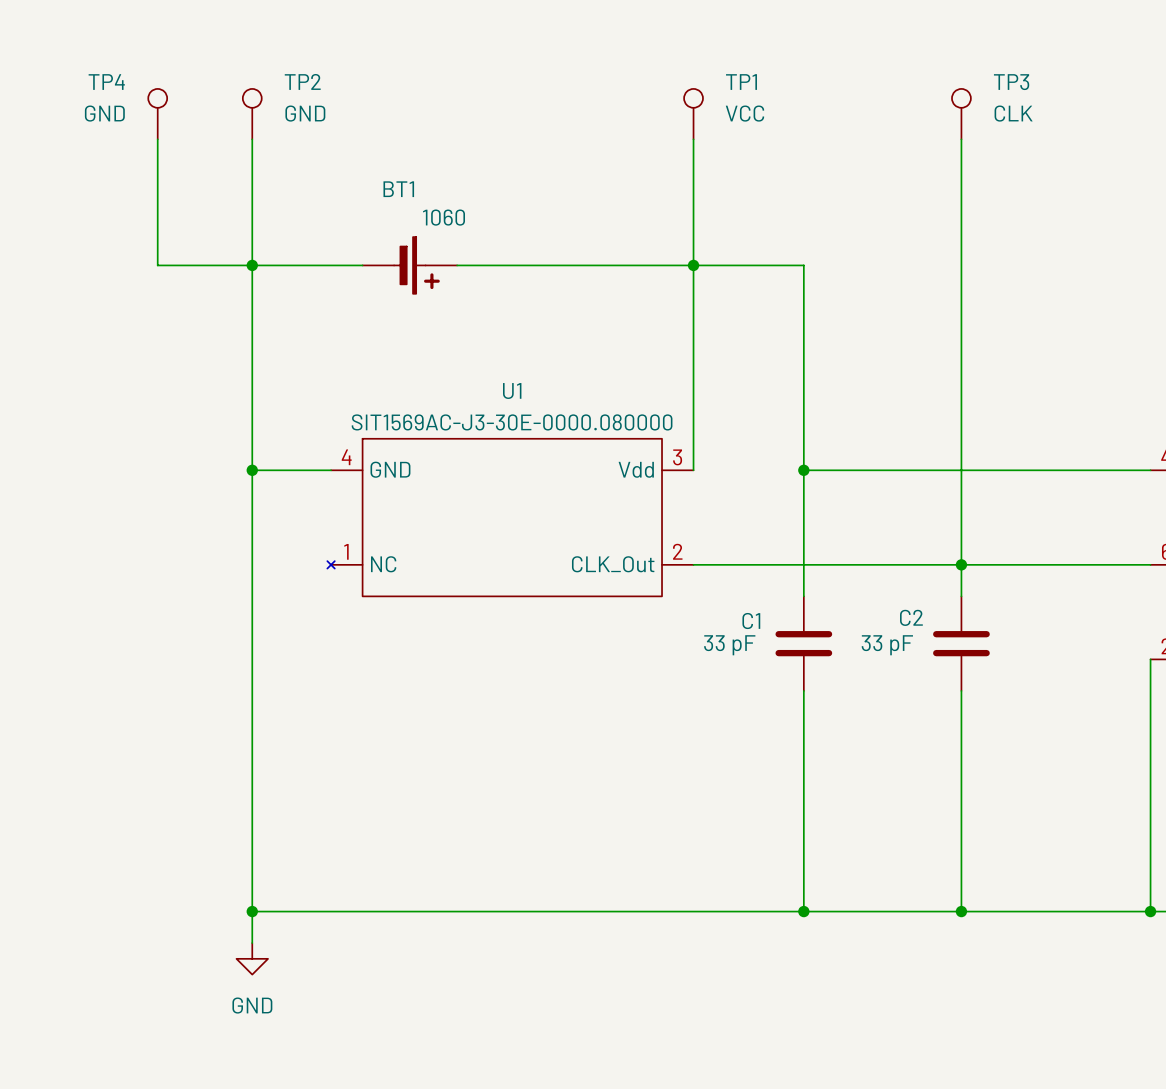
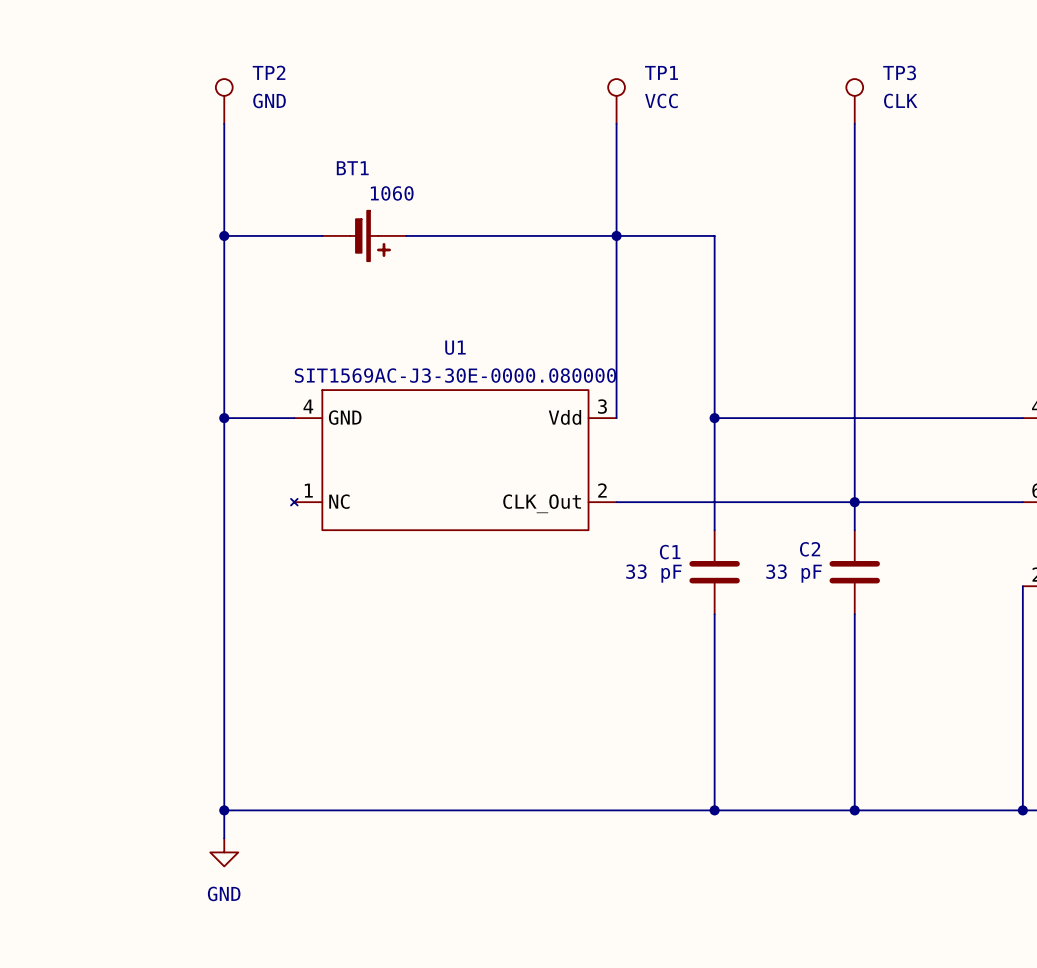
TP4: GND (157, 114) -> none
wire: (157, 139) (157, 265) (252, 265) -> none

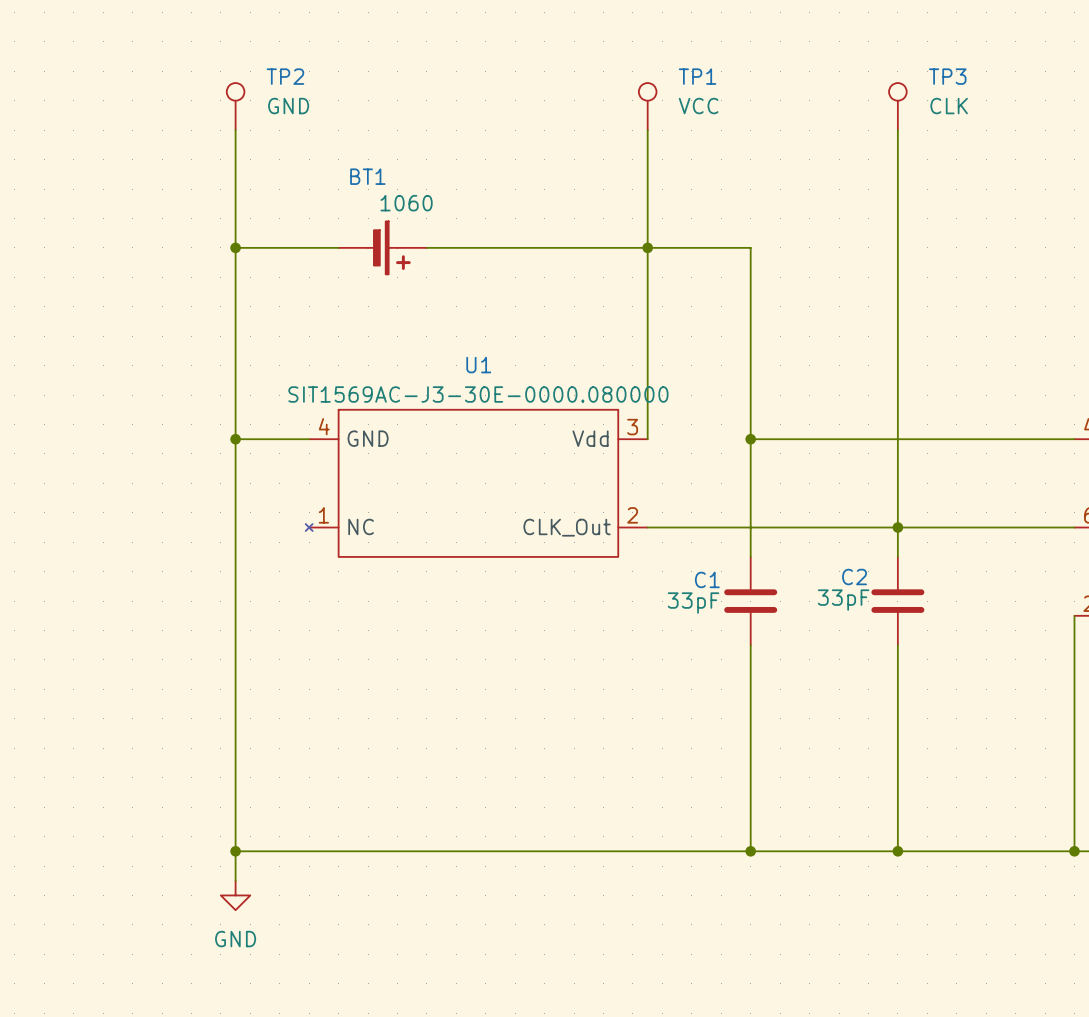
C2 value: none -> 33pF (843, 600)
C1 text: 33 pF (653, 573) -> none
C1 value: none -> 33pF (693, 603)
C2 text: 33 pF (794, 573) -> none

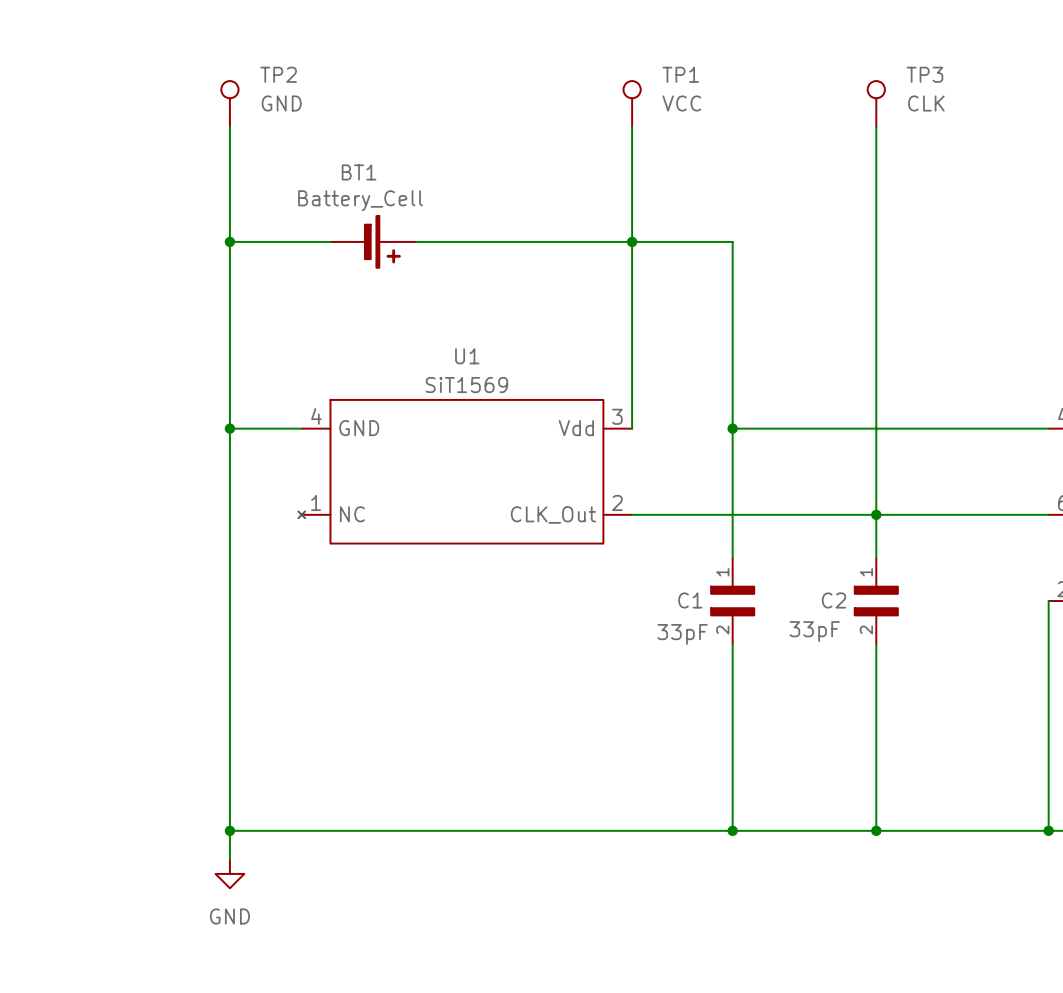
BT1 value: 1060 (406, 203) -> Battery_Cell (360, 200)
U1 value: SIT1569AC-J3-30E-0000.080000 (478, 394) -> SiT1569 (466, 385)
C1 symbol: [724, 556, 778, 646] -> [710, 557, 755, 645]
C2 symbol: [871, 556, 925, 646] -> [854, 557, 899, 645]
C2 name position: C2 (854, 577) -> C2 (834, 600)
C2 value position: 33pF (843, 600) -> 33pF (814, 631)
C1 value position: 33pF (693, 603) -> 33pF (682, 634)

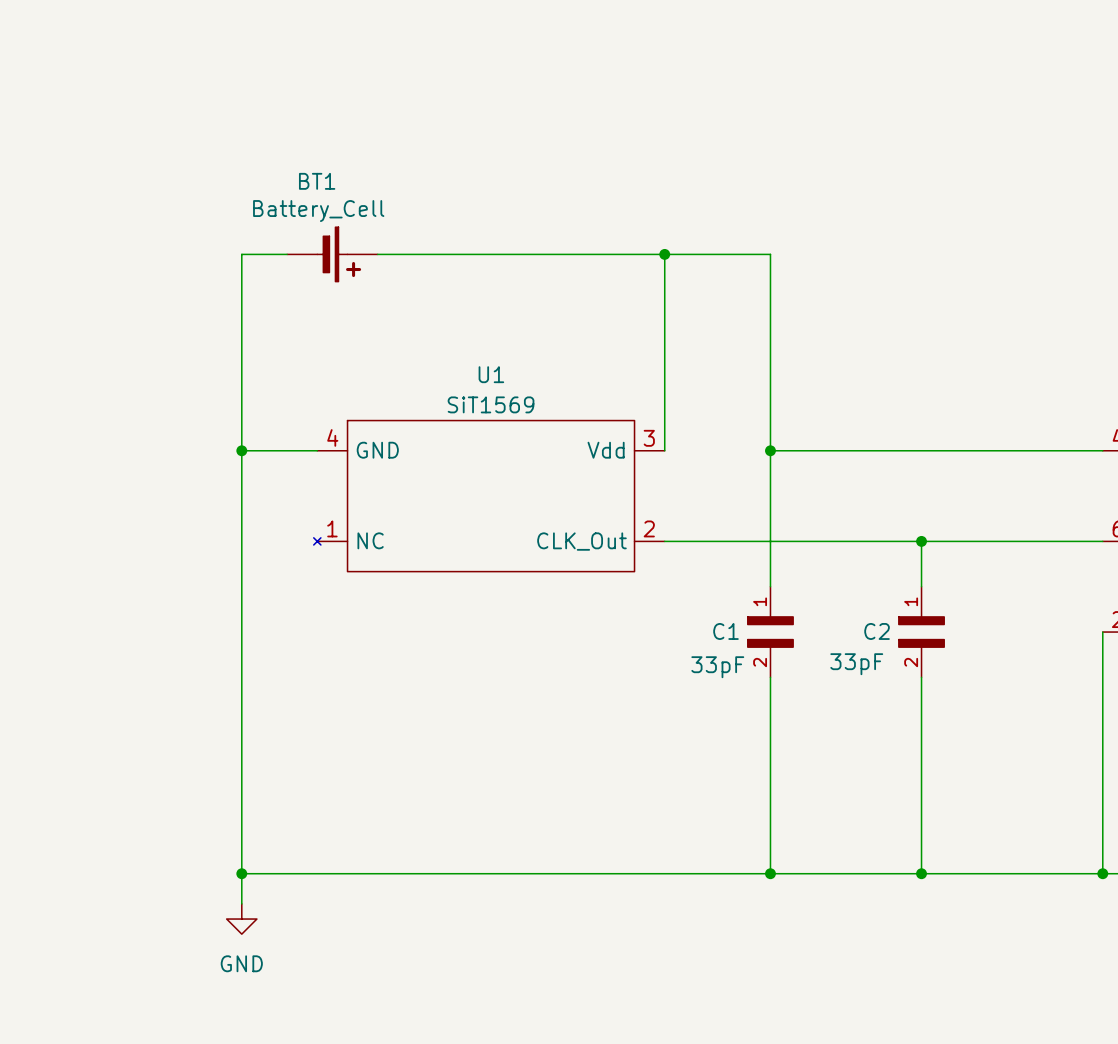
TP2: GND (229, 104) -> none
TP1: VCC (632, 104) -> none
TP3: CLK (876, 104) -> none
wire: (229, 127) (229, 241) -> none
wire: (632, 127) (632, 241) -> none
wire: (876, 127) (876, 514) -> none
junction: (229, 241) -> none
BT1 position: (373, 241) -> (332, 254)

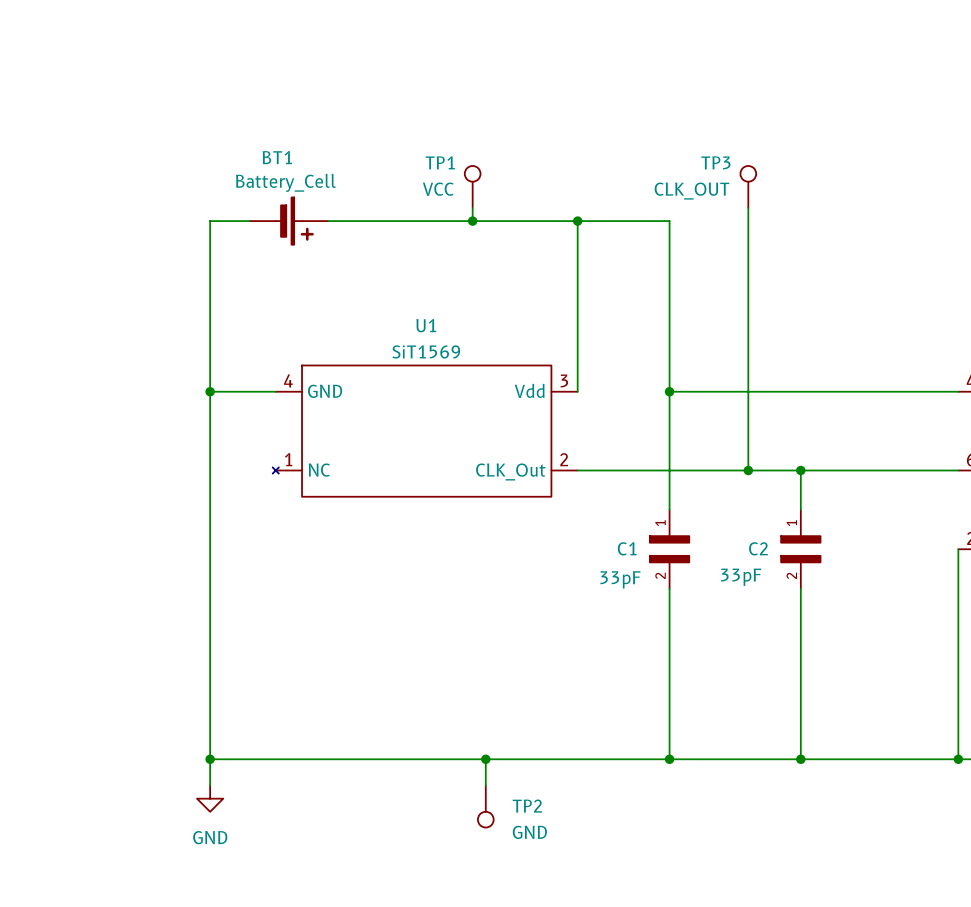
TP1: none -> VCC (472, 186)
TP3: none -> CLK_OUT (748, 186)
wire: none -> (472, 207) (472, 221)
wire: none -> (748, 207) (748, 470)
junction: none -> (472, 221)
junction: none -> (748, 470)
wire: none -> (485, 759) (485, 785)
junction: none -> (485, 759)
TP2: none -> GND (485, 806)

